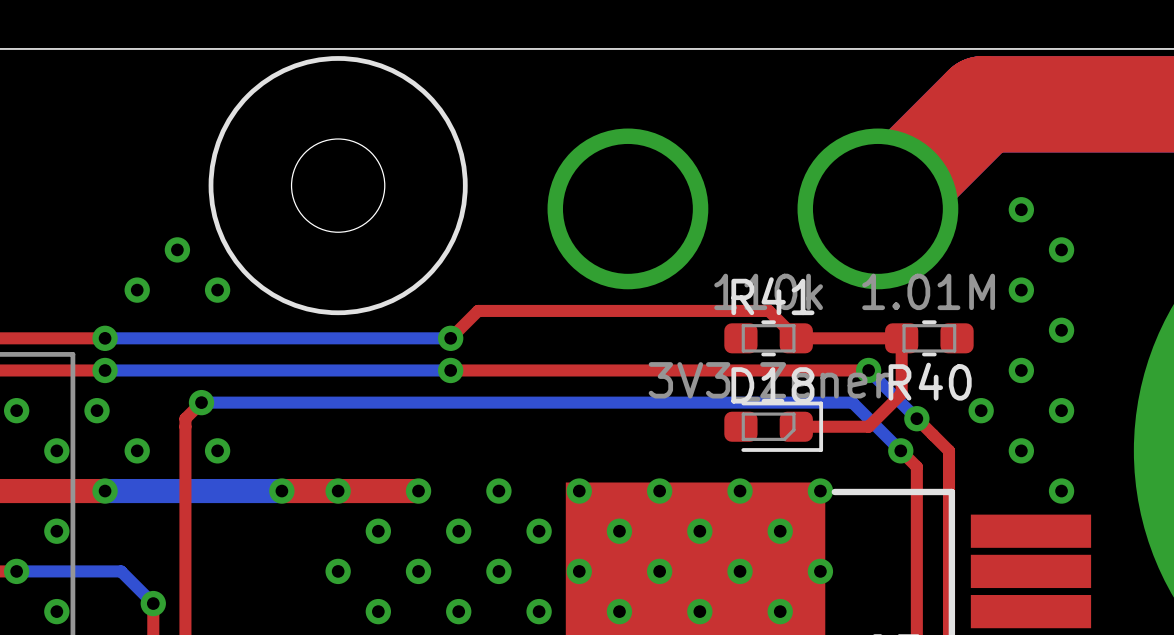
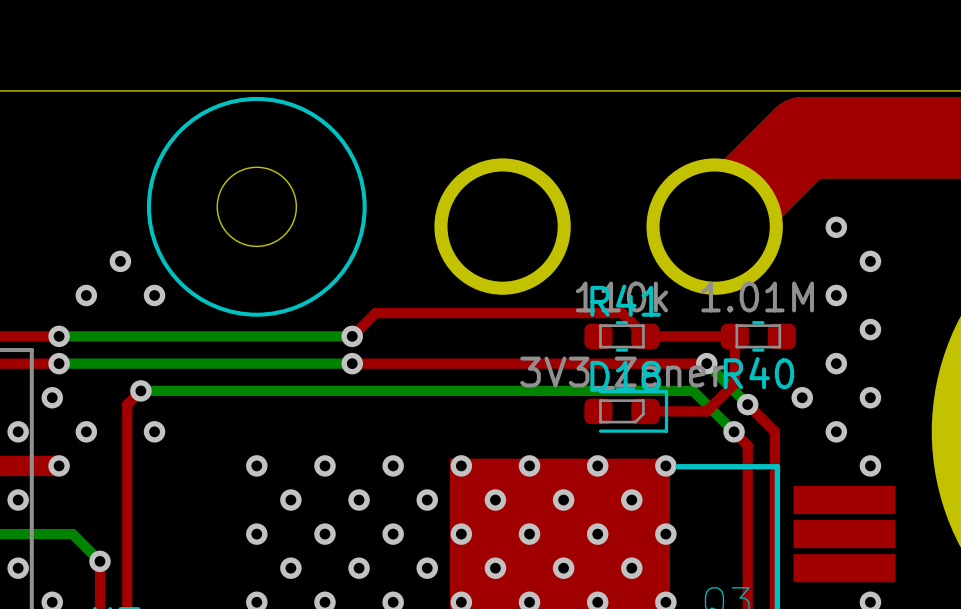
bottom track: (105, 491) (281, 491) -> none
top track: (281, 491) (418, 491) -> none
via: (281, 491) -> none

